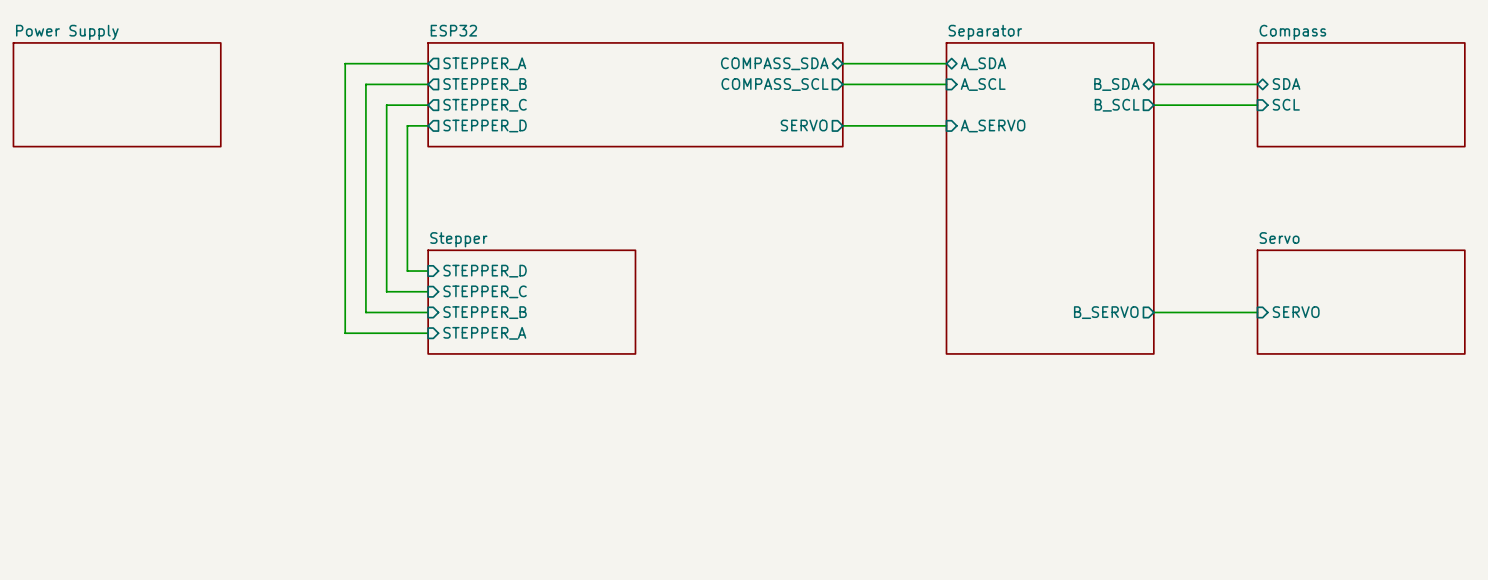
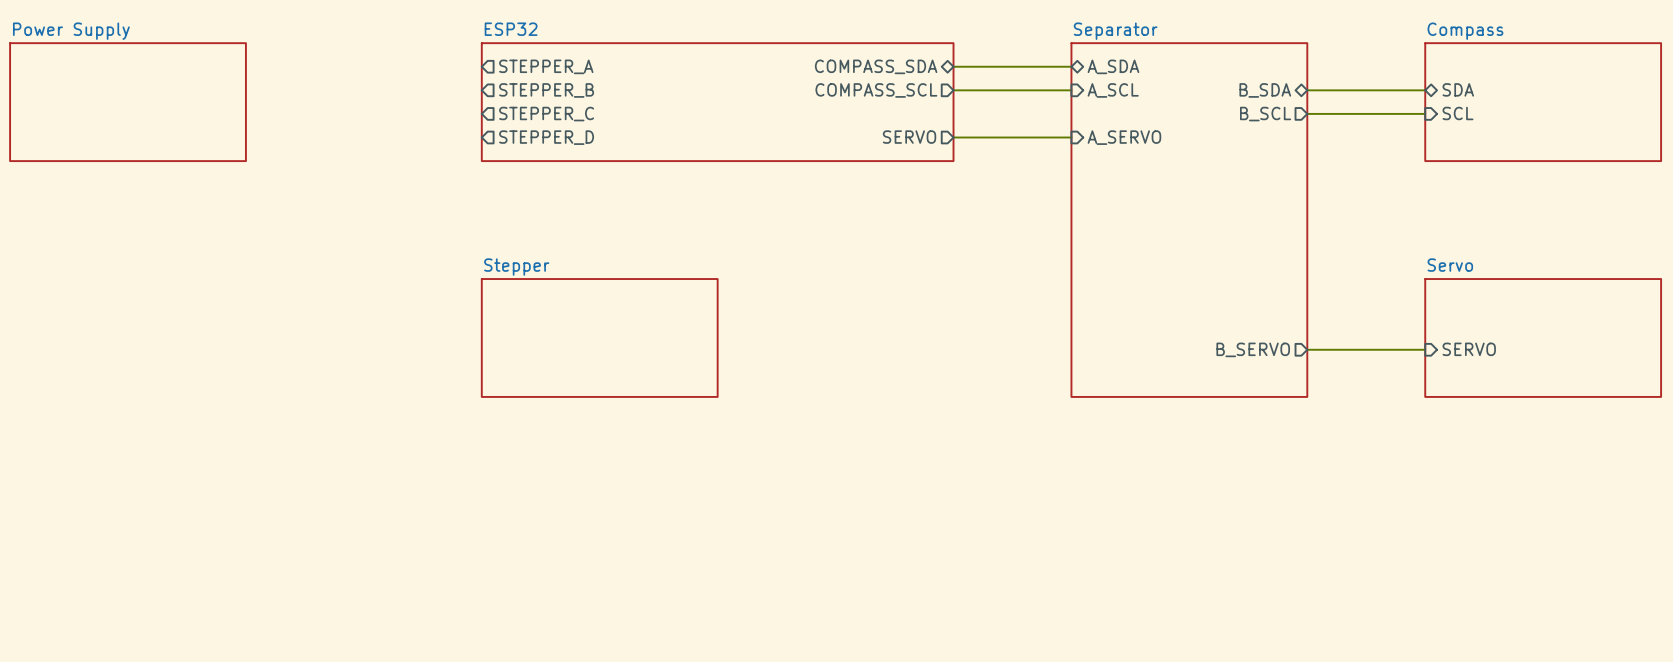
wire: (428, 63) (345, 63) (345, 333) (428, 333) -> none
wire: (428, 84) (365, 84) (365, 312) (428, 312) -> none
wire: (428, 105) (386, 105) (386, 291) (428, 291) -> none
wire: (428, 125) (407, 125) (407, 271) (428, 271) -> none
sheet pin: STEPPER_D (485, 271) -> none
sheet pin: STEPPER_C (485, 291) -> none
sheet pin: STEPPER_B (485, 312) -> none
sheet pin: STEPPER_A (484, 333) -> none

